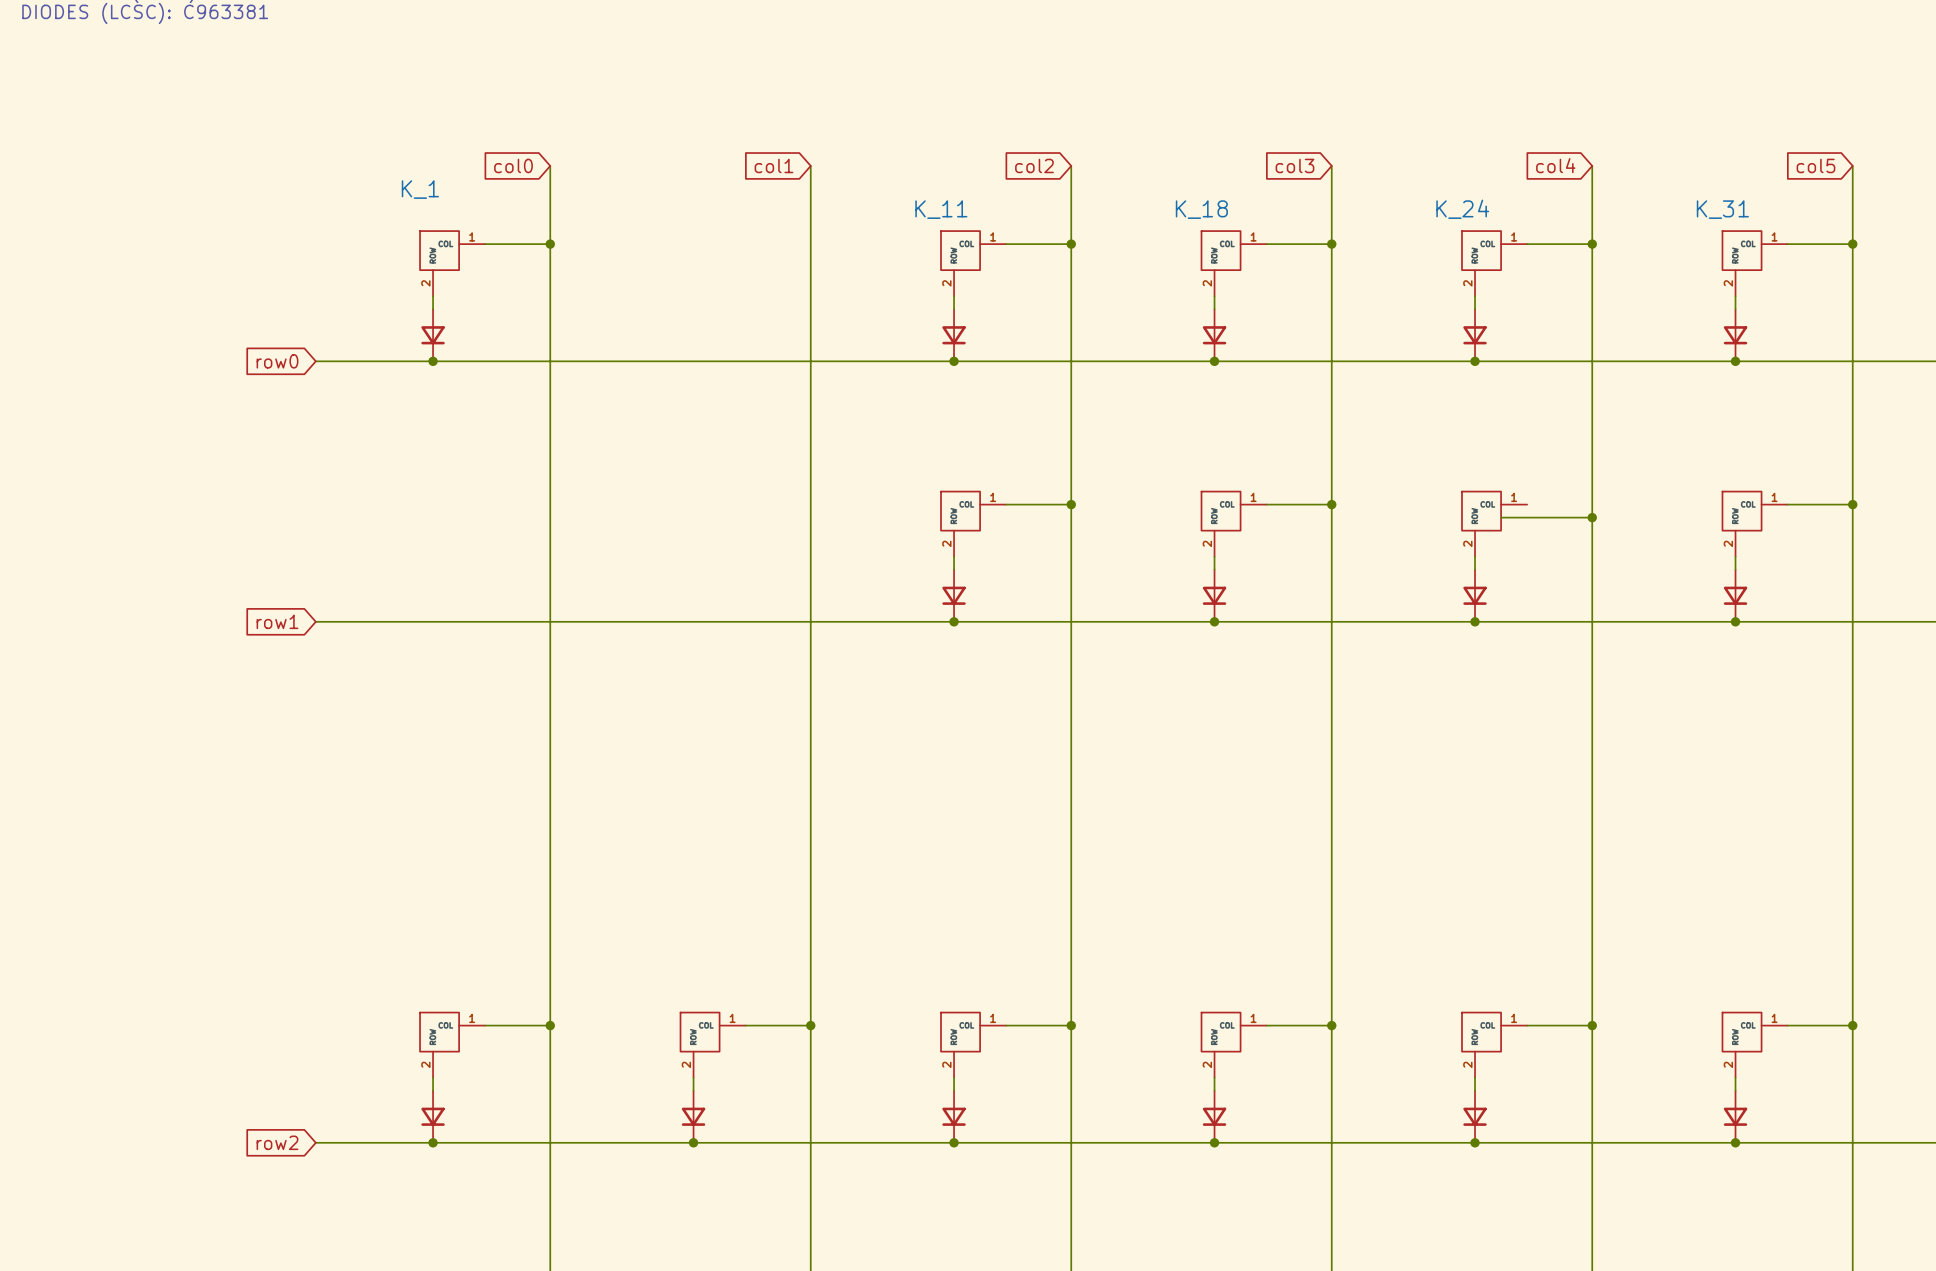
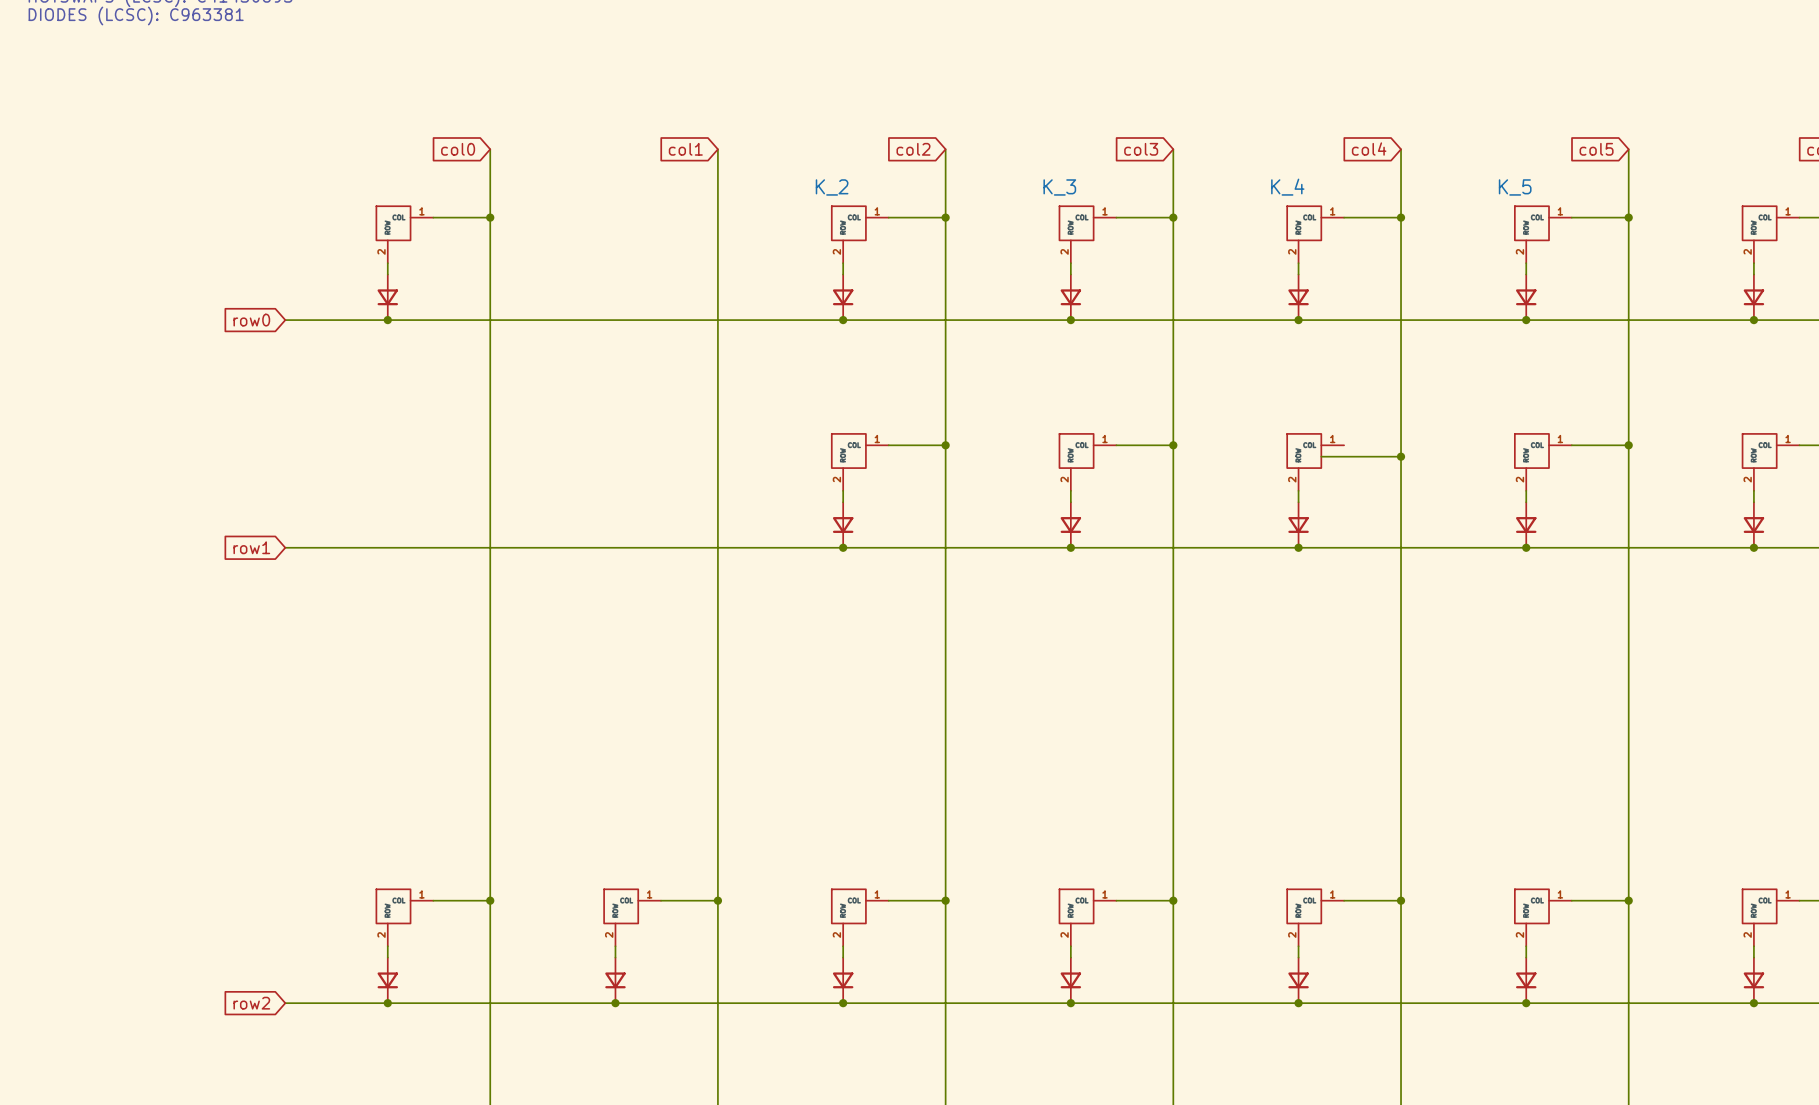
K_1 name: K_1 (420, 189) -> none
K_11 name: K_11 (941, 209) -> K_2 (832, 187)
K_18 name: K_18 (1201, 209) -> K_3 (1059, 187)
K_24 name: K_24 (1462, 209) -> K_4 (1287, 187)
K_31 name: K_31 (1722, 209) -> K_5 (1515, 187)

